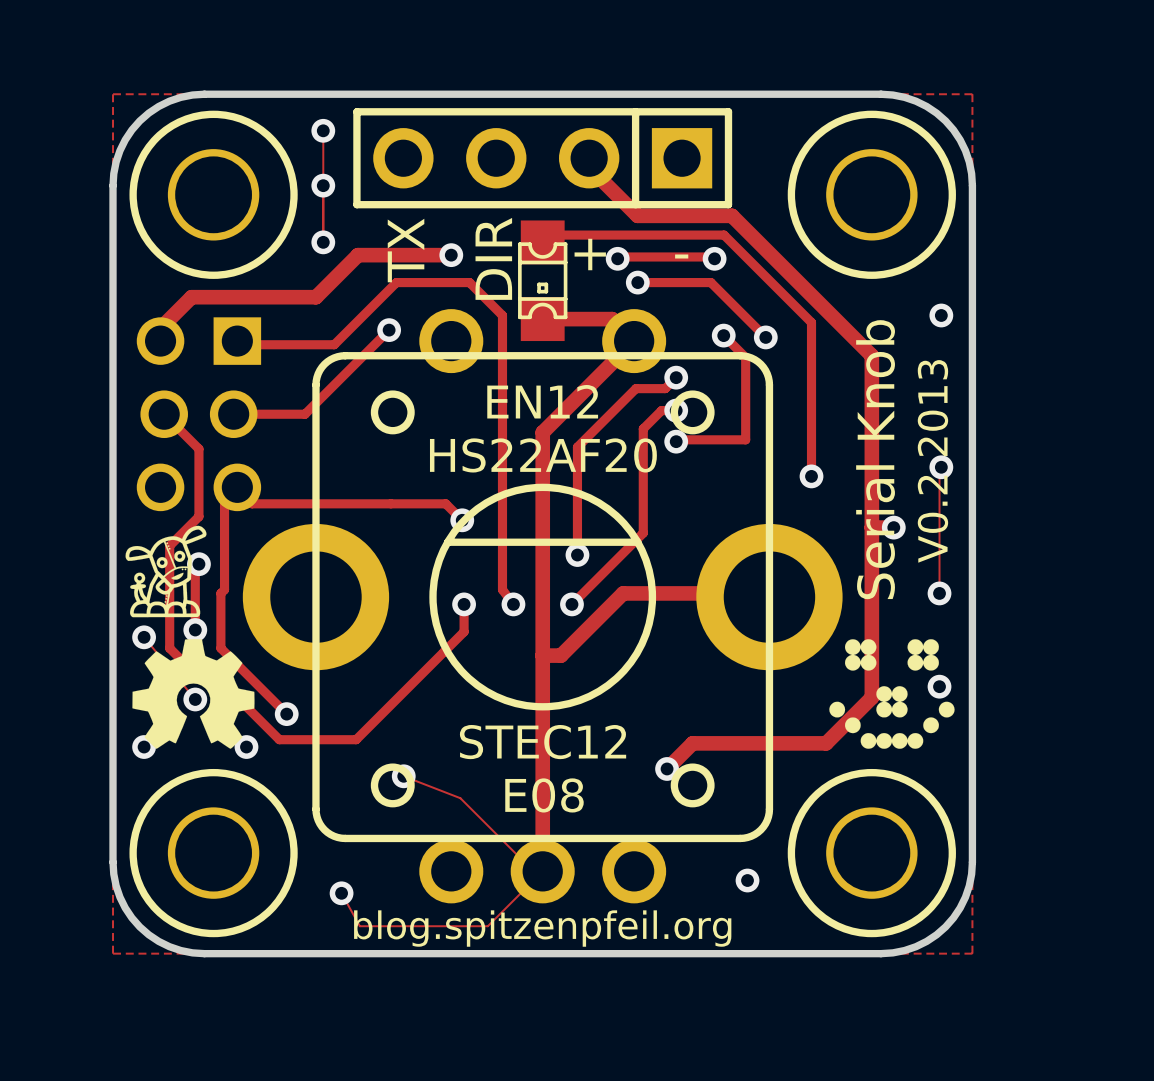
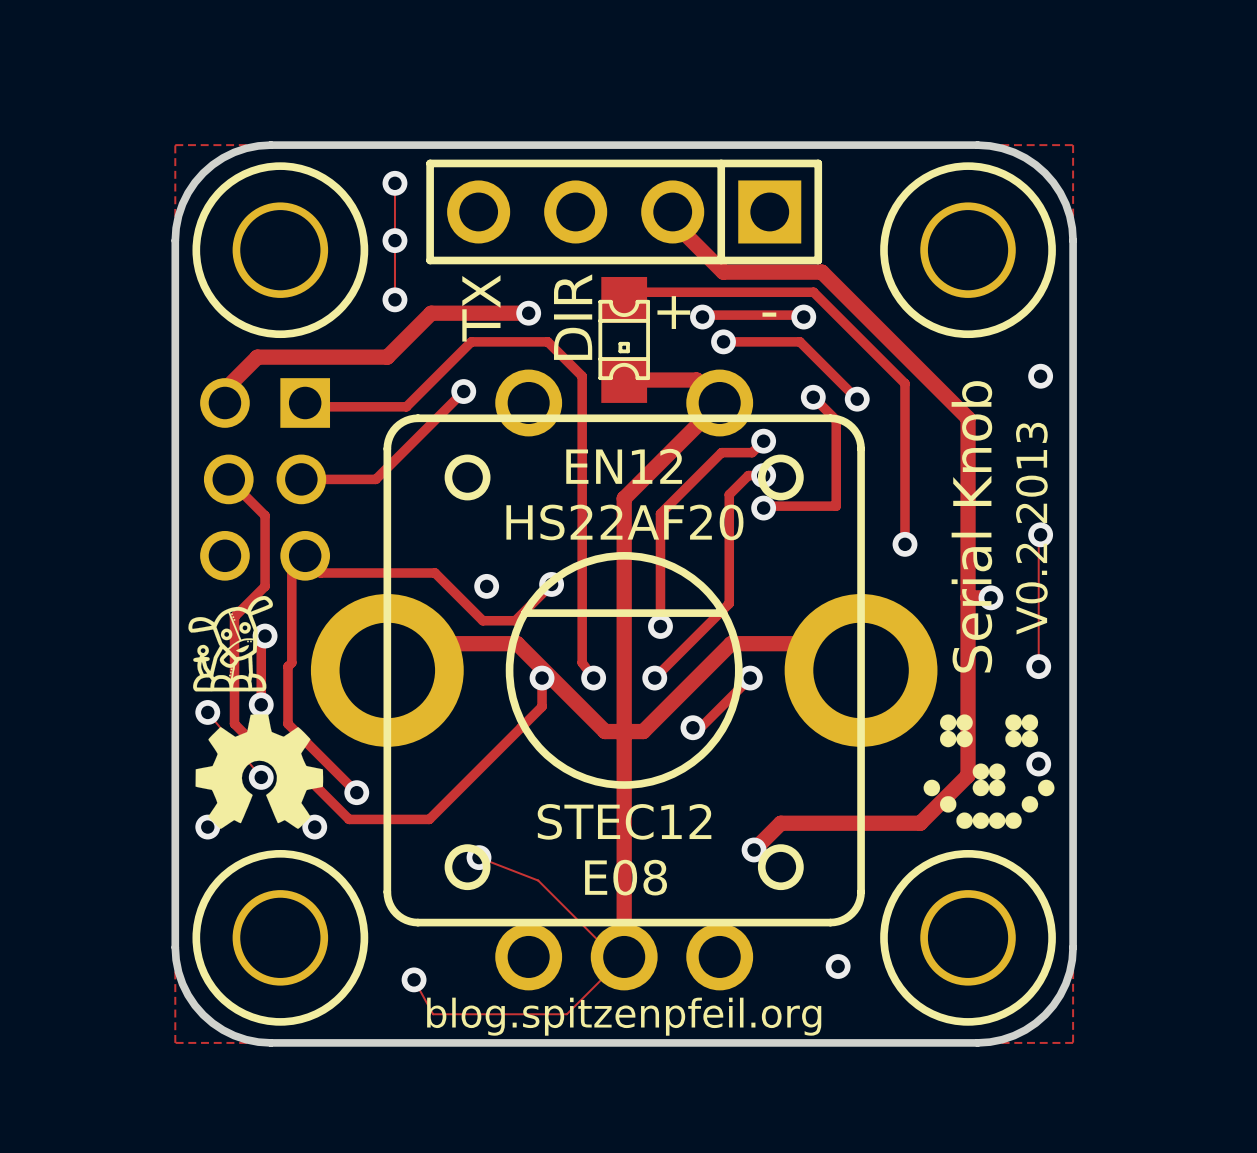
track: (361, 503) (445, 503) (462, 520) -> (435, 573) (482, 620) (515, 620) (551, 584)
via: none -> (486, 586)
via position: (462, 520) -> (551, 584)
track: none -> (393, 664) (414, 643) (517, 643) (605, 731) (624, 731)
track: (623, 593) (765, 593) -> (708, 666) (731, 643) (834, 643) (857, 666)
track: none -> (750, 678) (700, 727) (692, 727)
via: none -> (750, 678)
via: none -> (692, 727)

